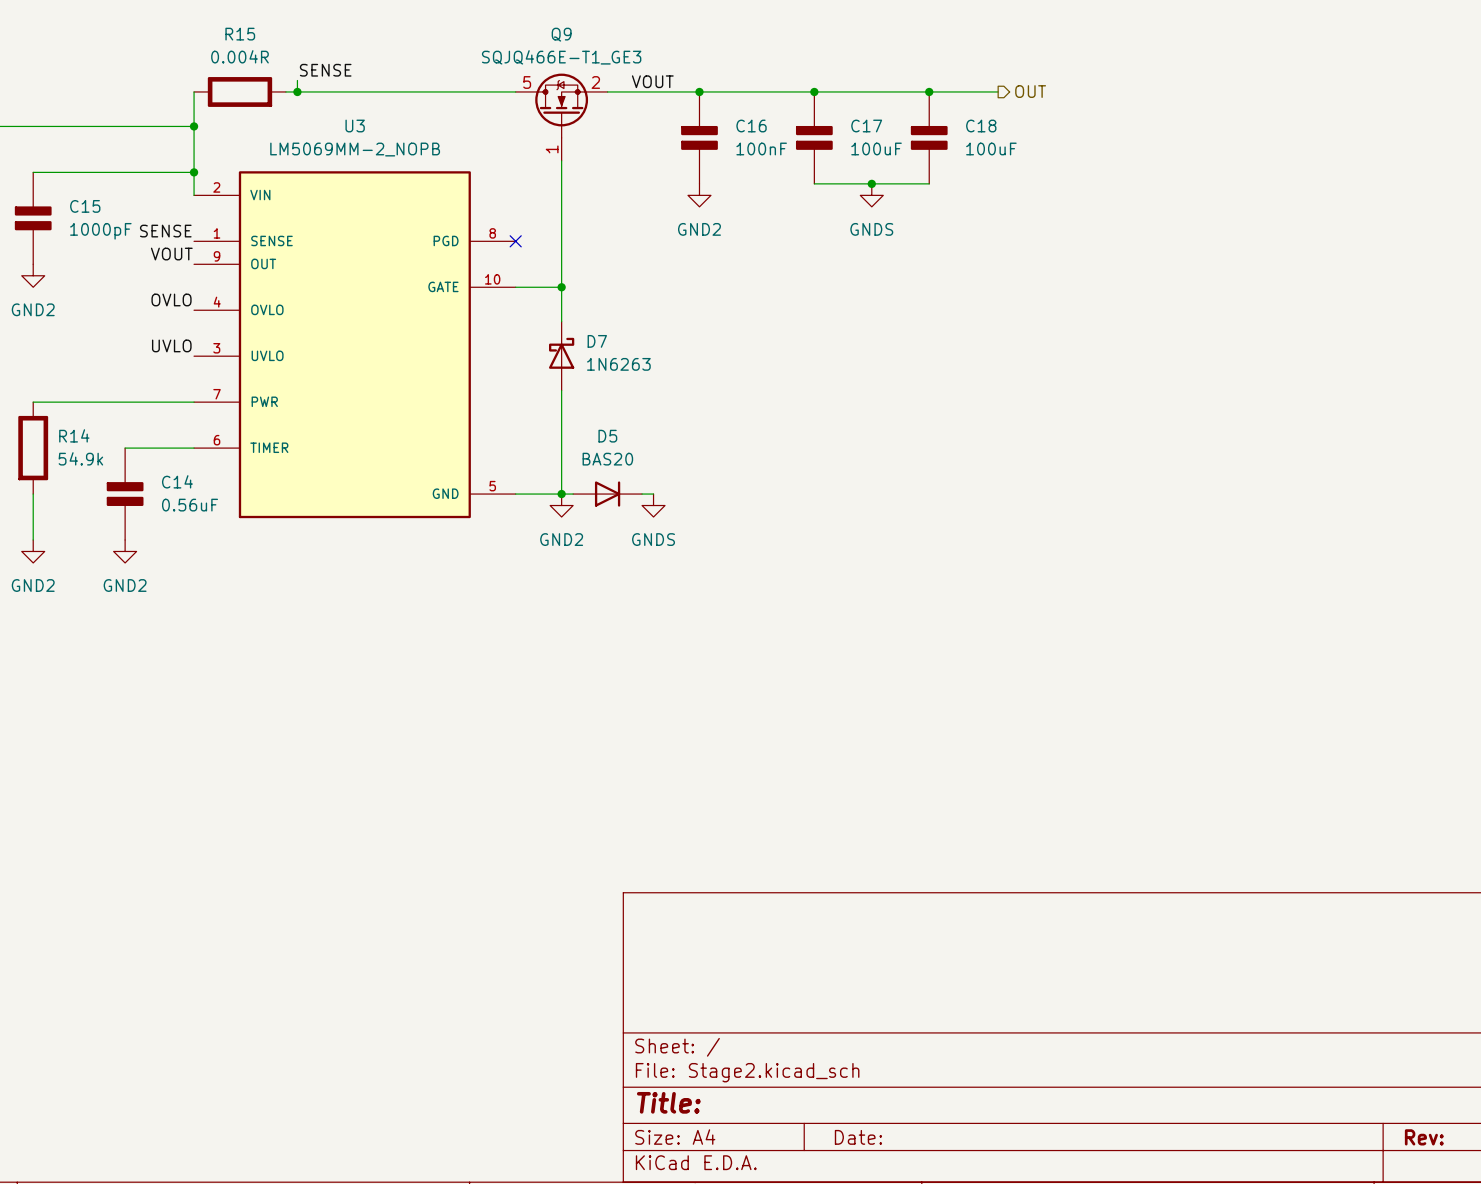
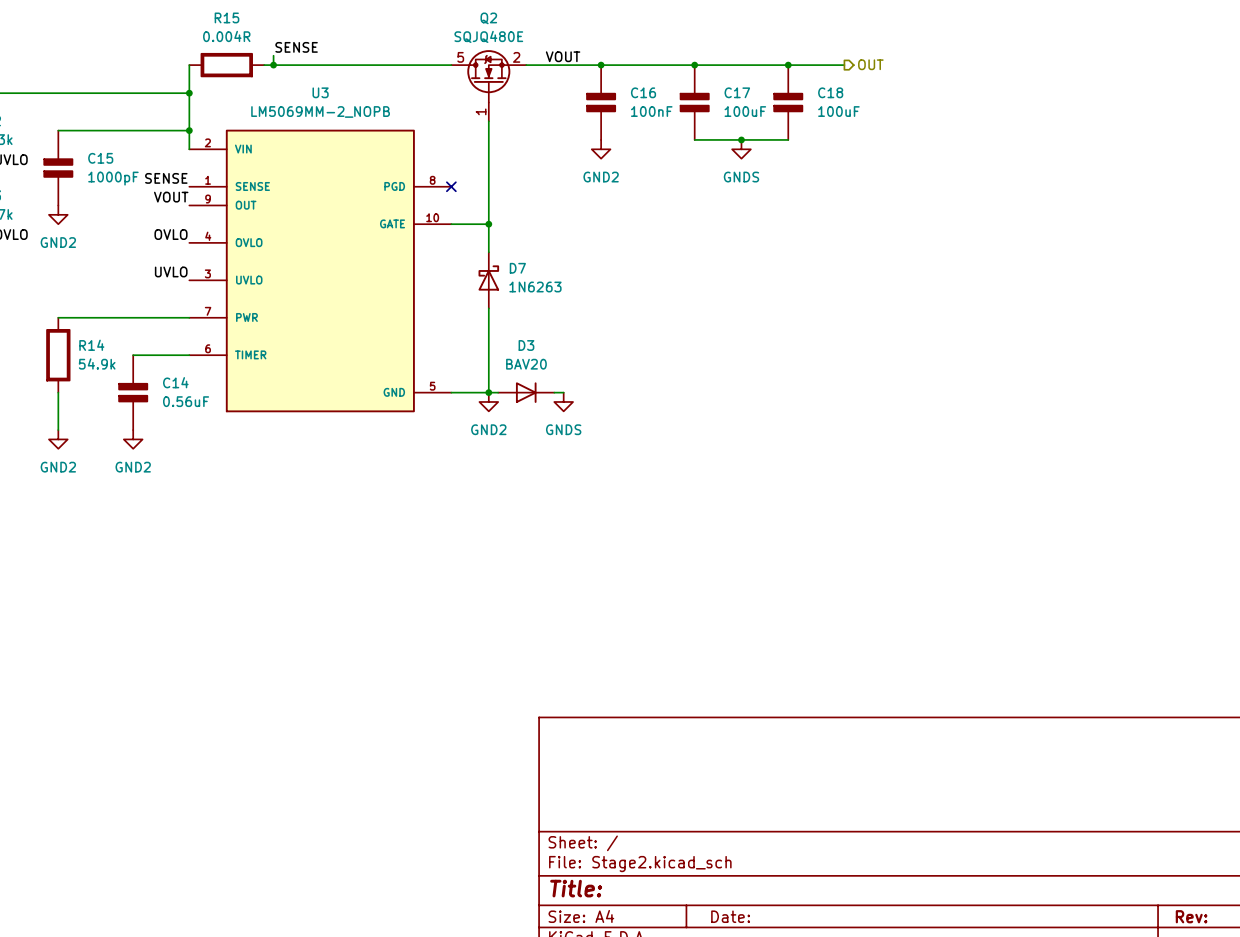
Q9 name: Q9 (561, 34) -> Q2 (488, 18)
Q9 value: SQJQ466E-T1_GE3 (561, 57) -> SQJQ480E (488, 36)
D5 name: D5 (607, 436) -> D3 (526, 345)
D5 value: BAS20 (607, 459) -> BAV20 (526, 364)

